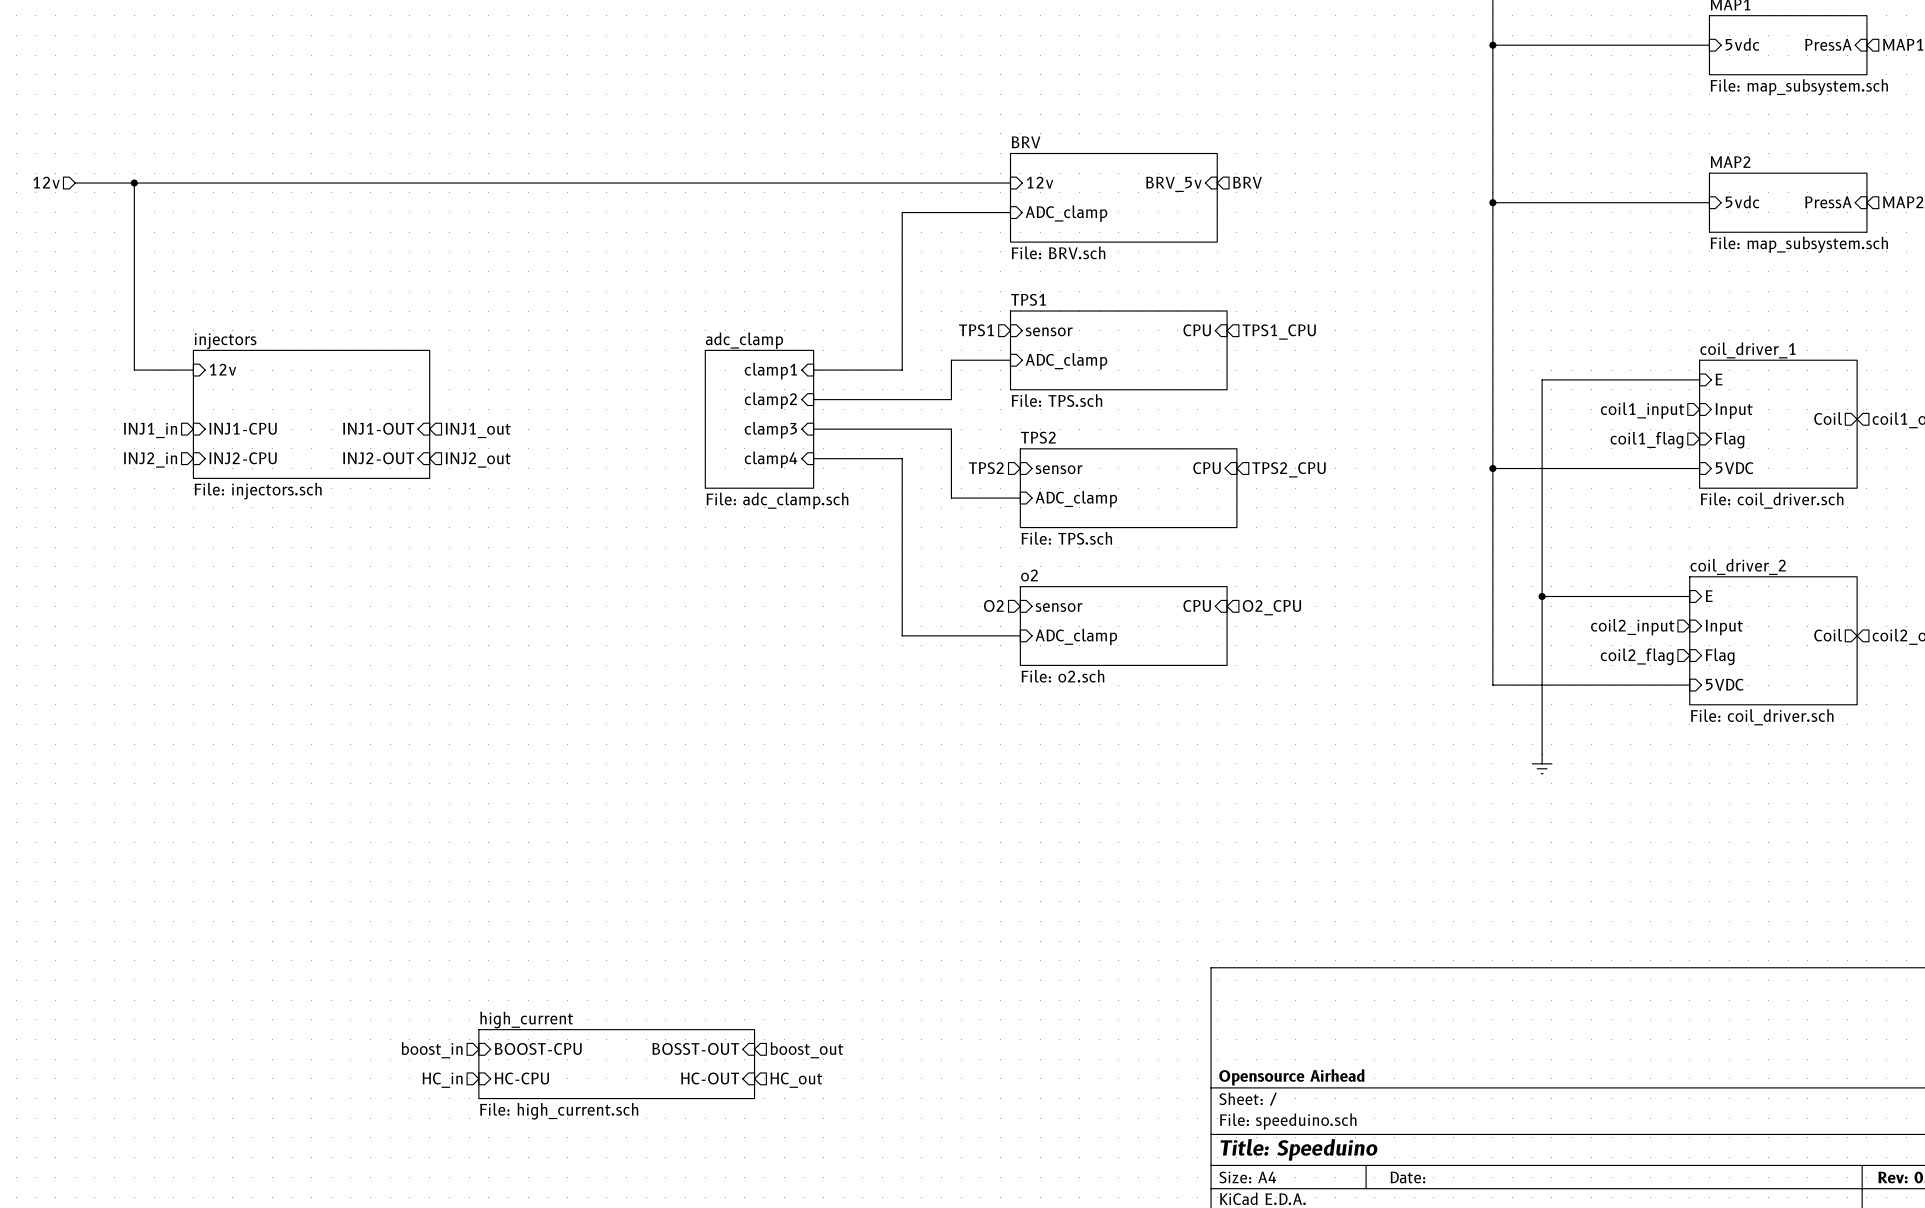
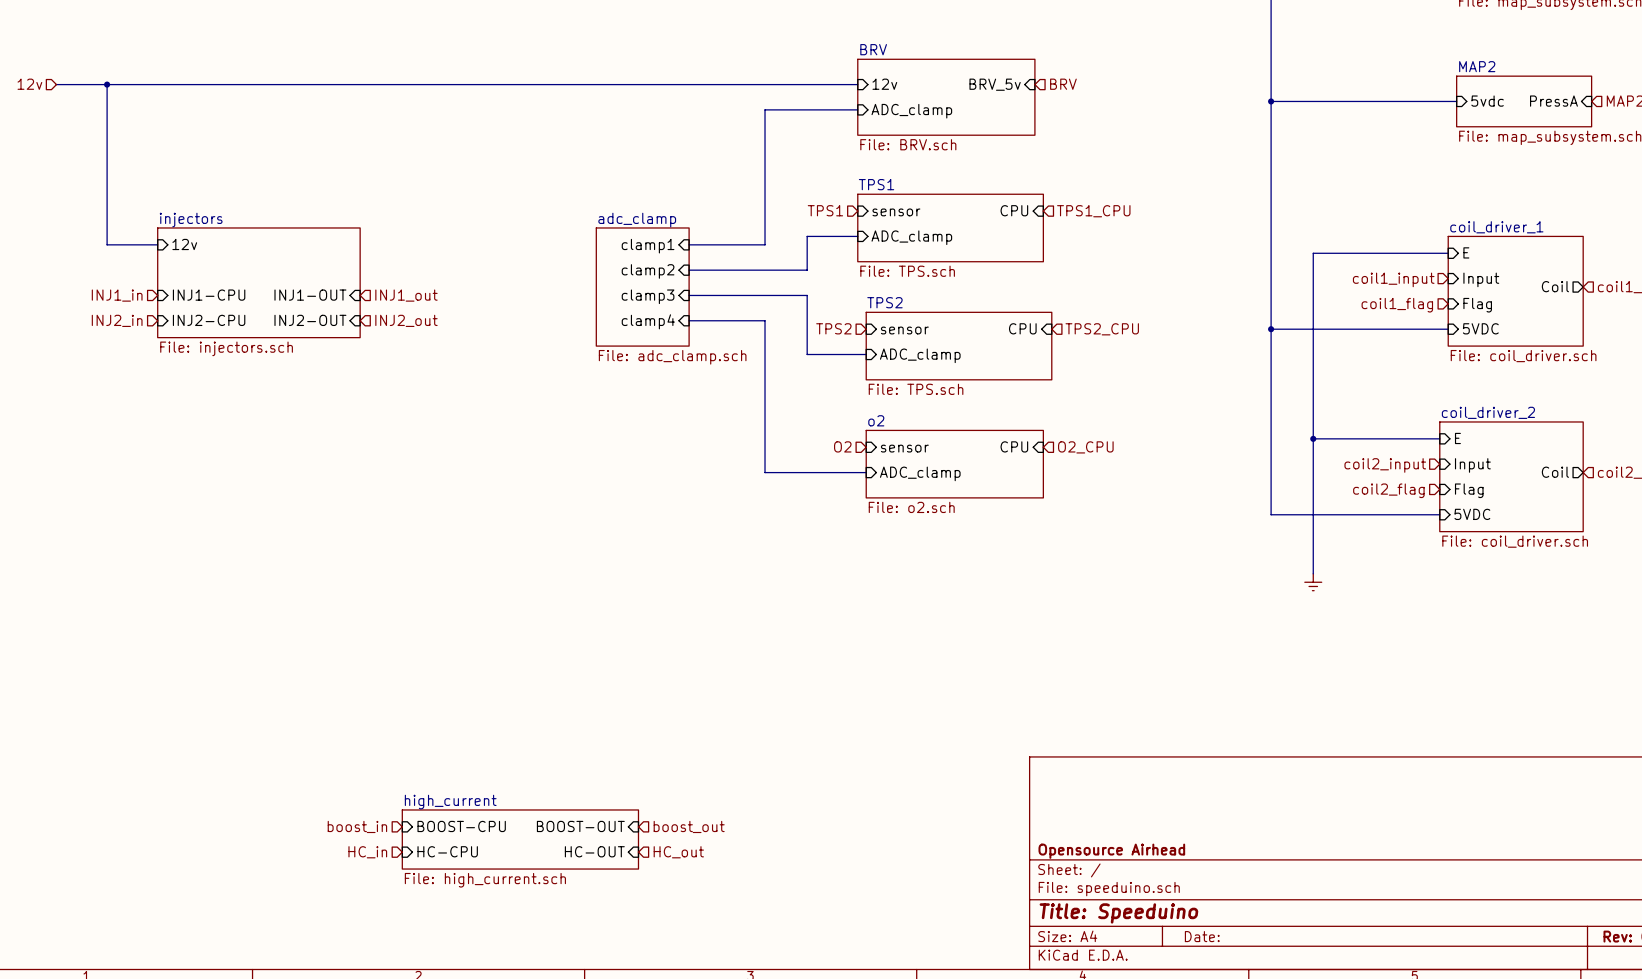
sheet pin: BOSST-OUT (695, 1048) -> BOOST-OUT (580, 826)

